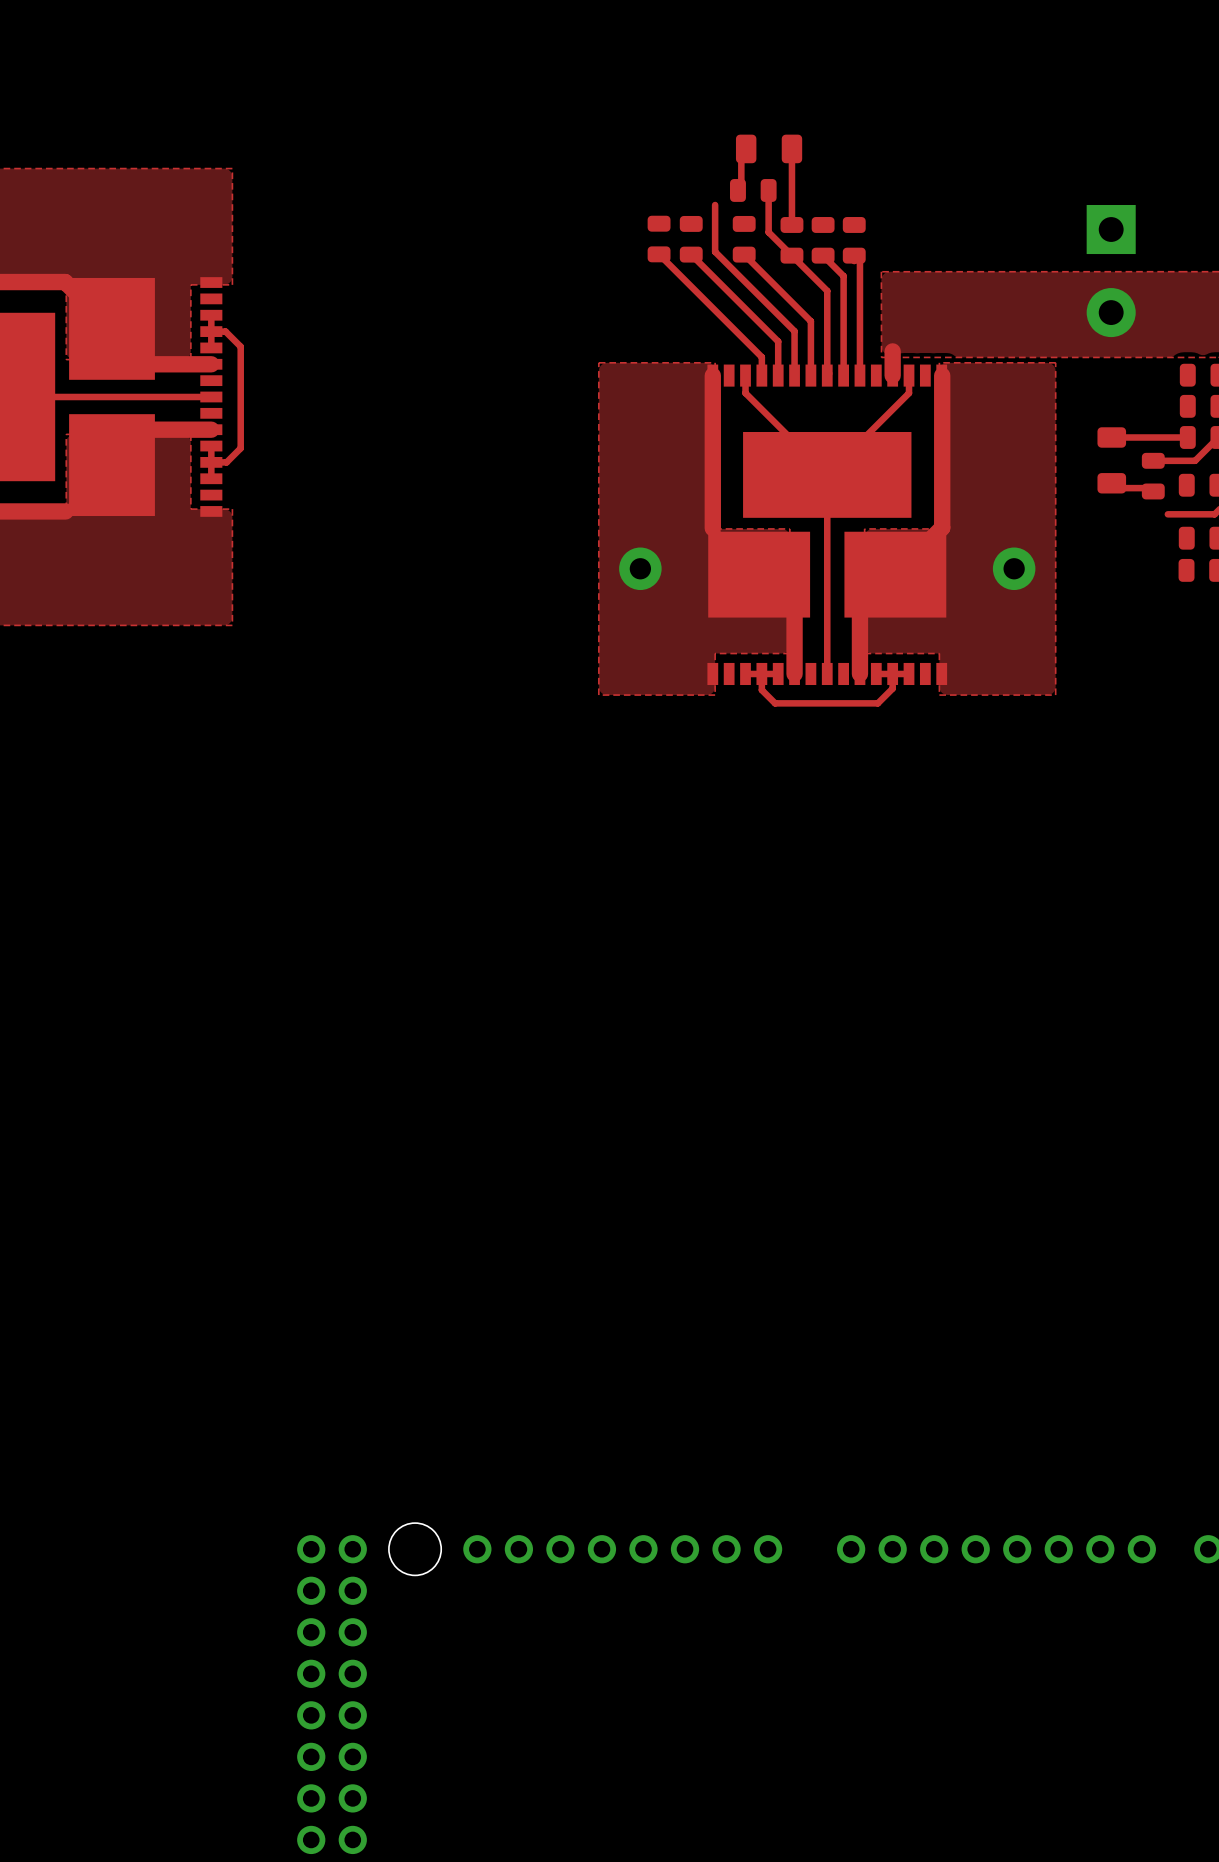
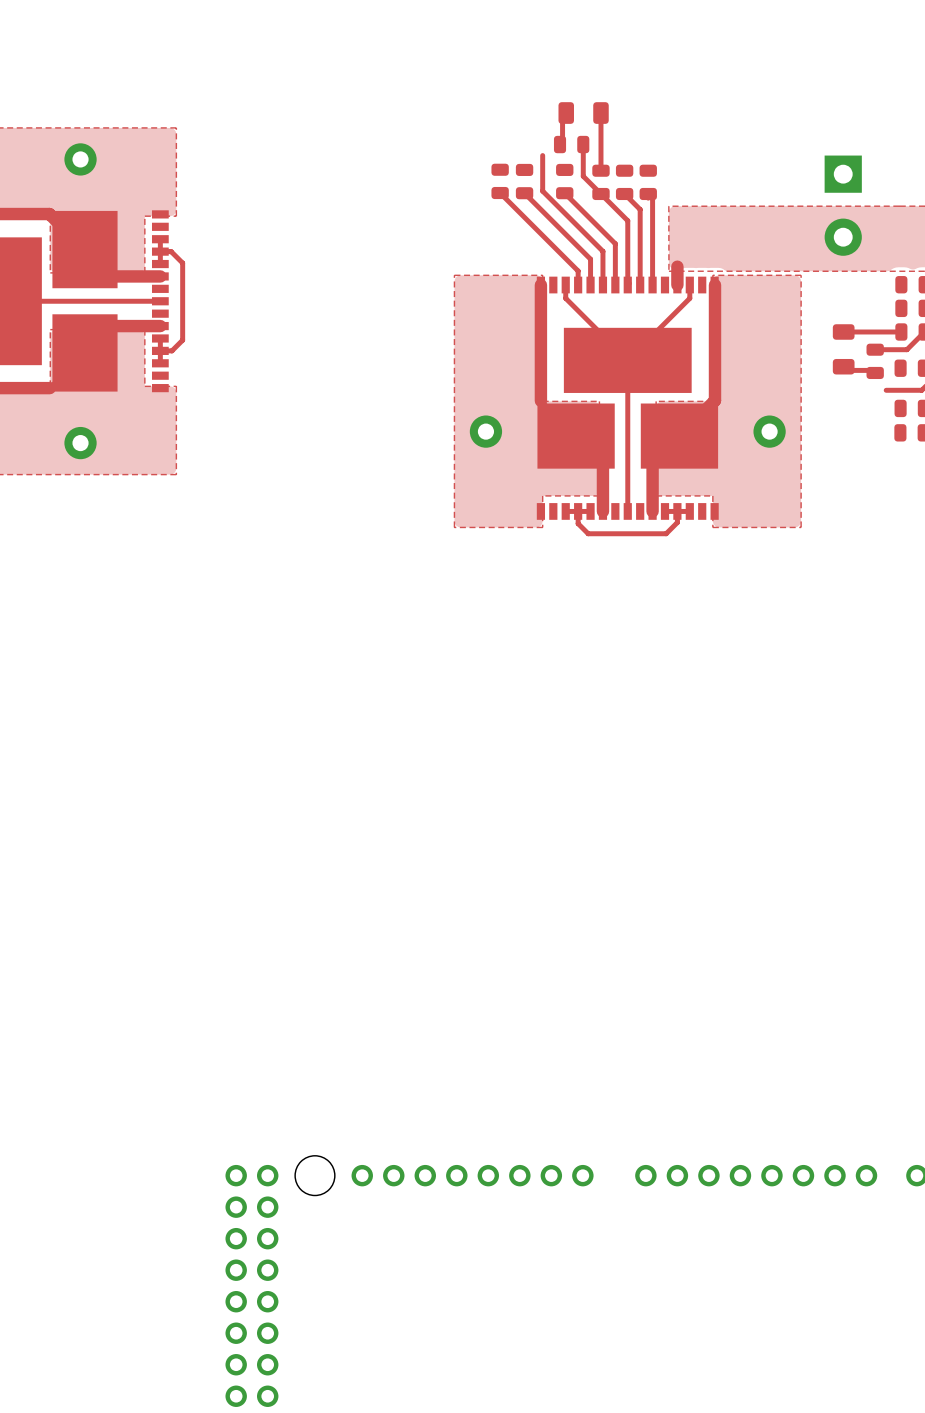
part: none -> (80, 159)
part: none -> (80, 443)

